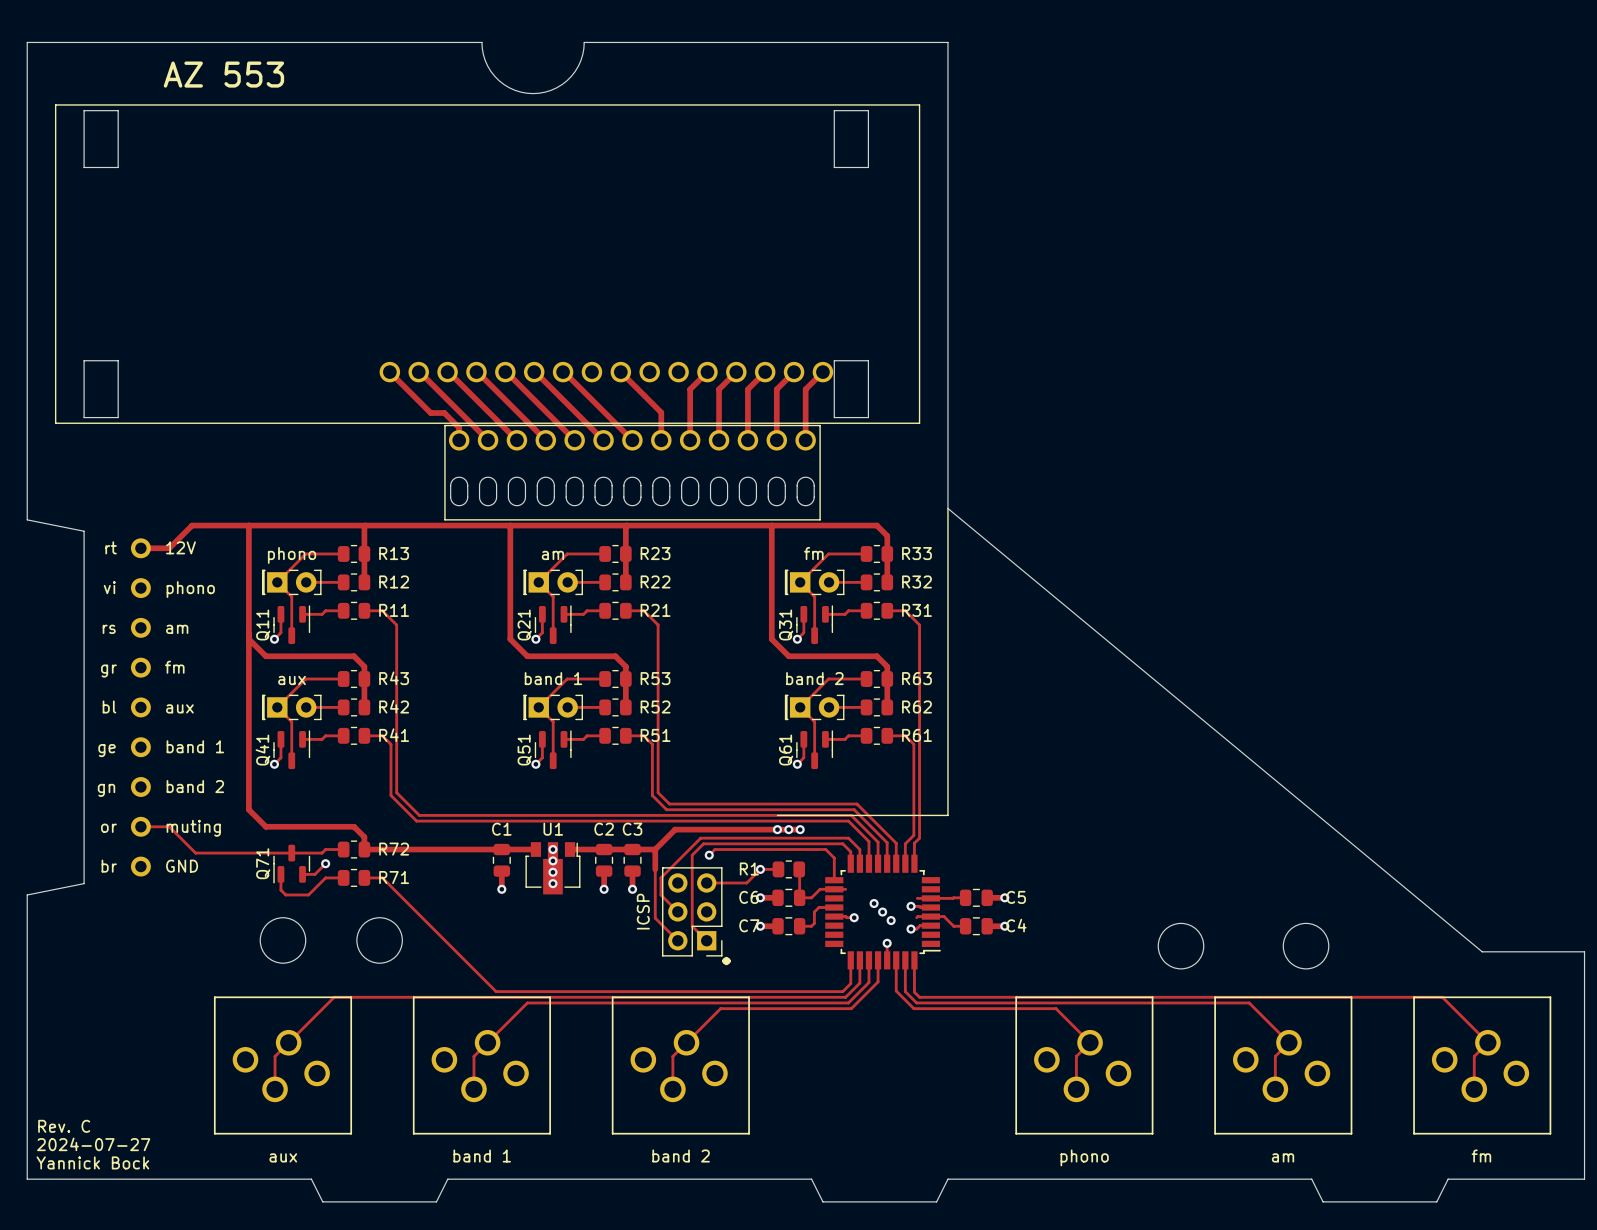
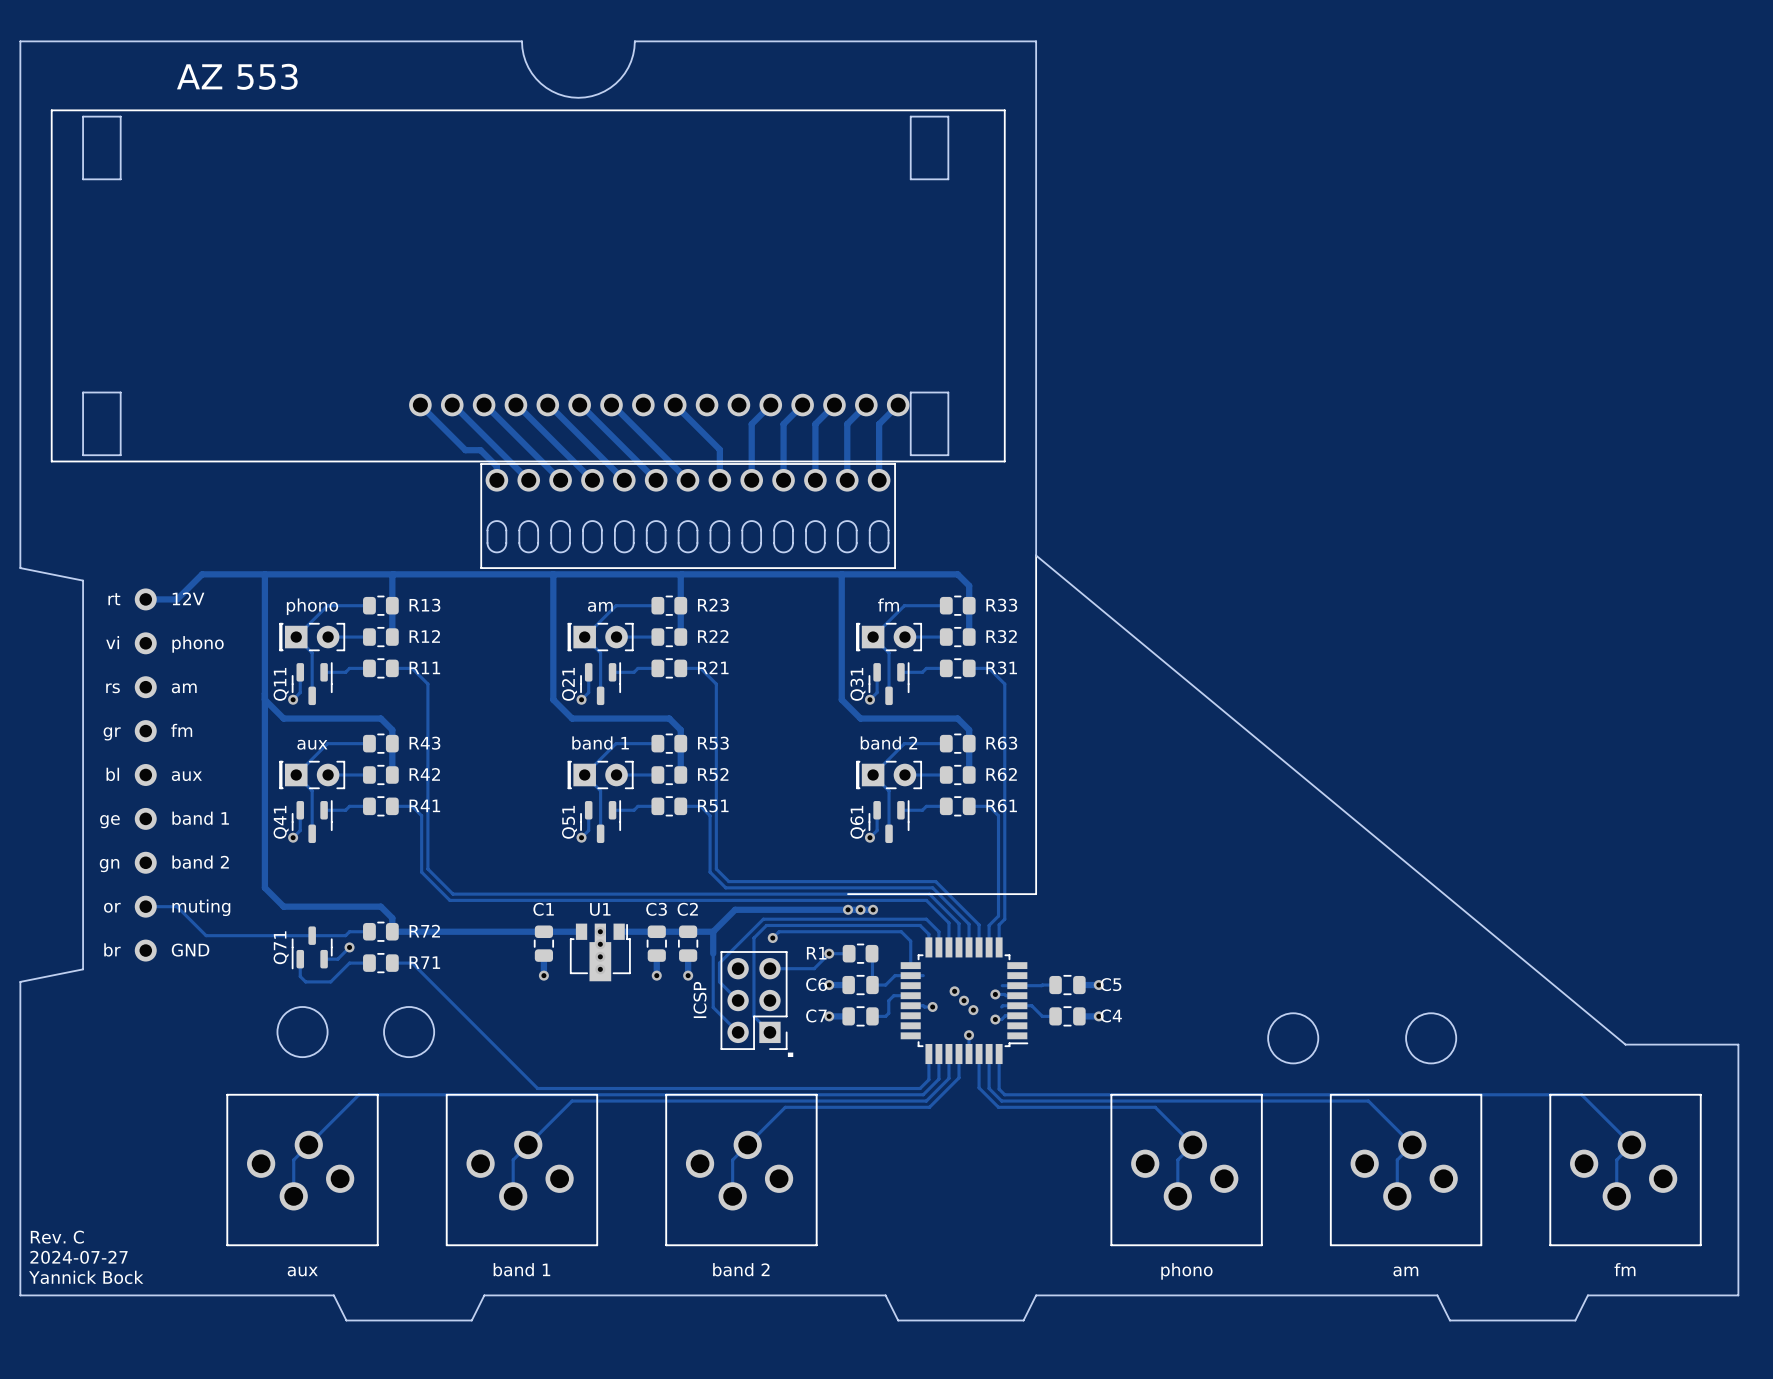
C2 name: C2 (604, 829) -> C3 (656, 909)
C3 name: C3 (632, 829) -> C2 (687, 909)

